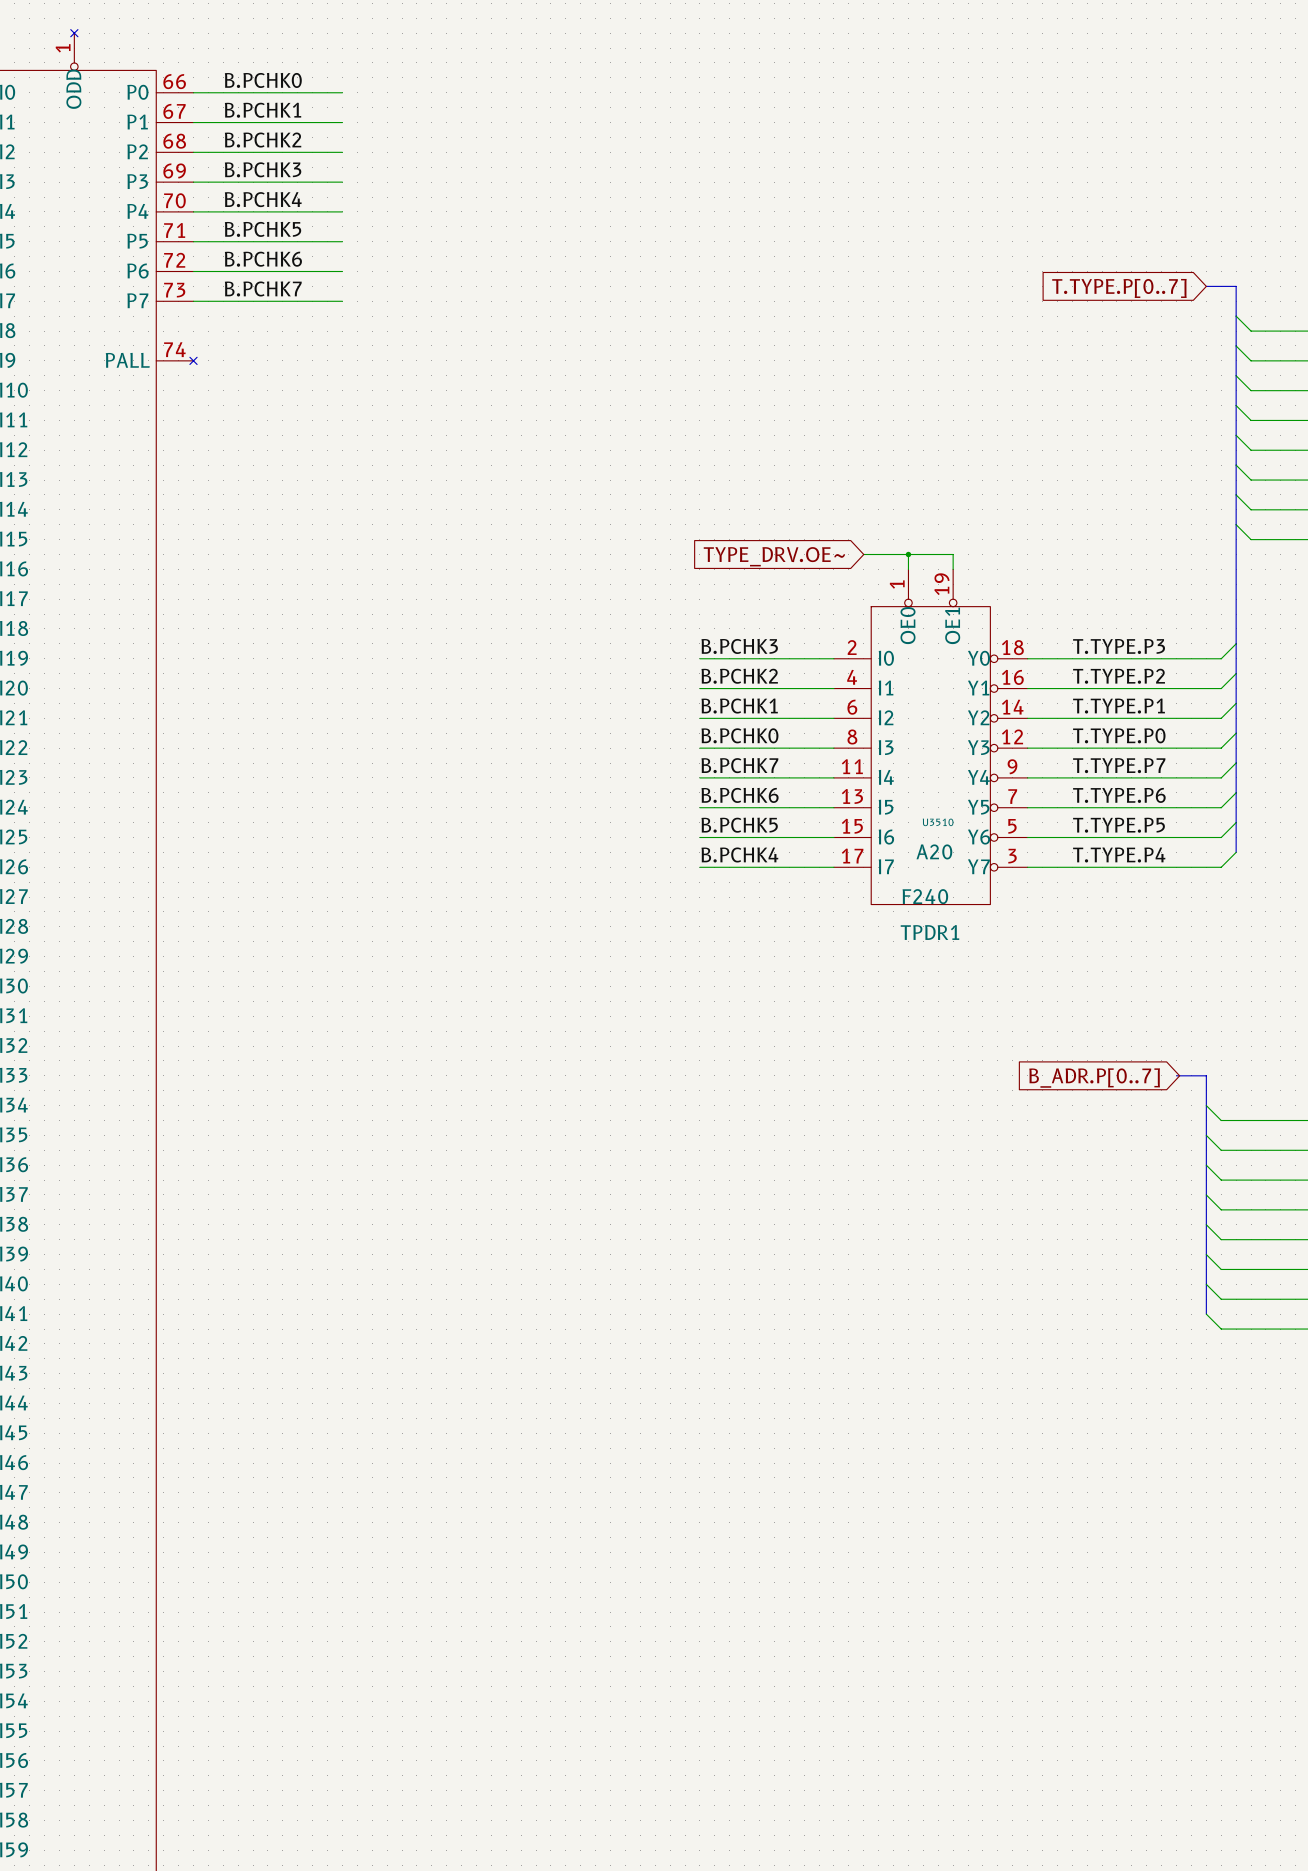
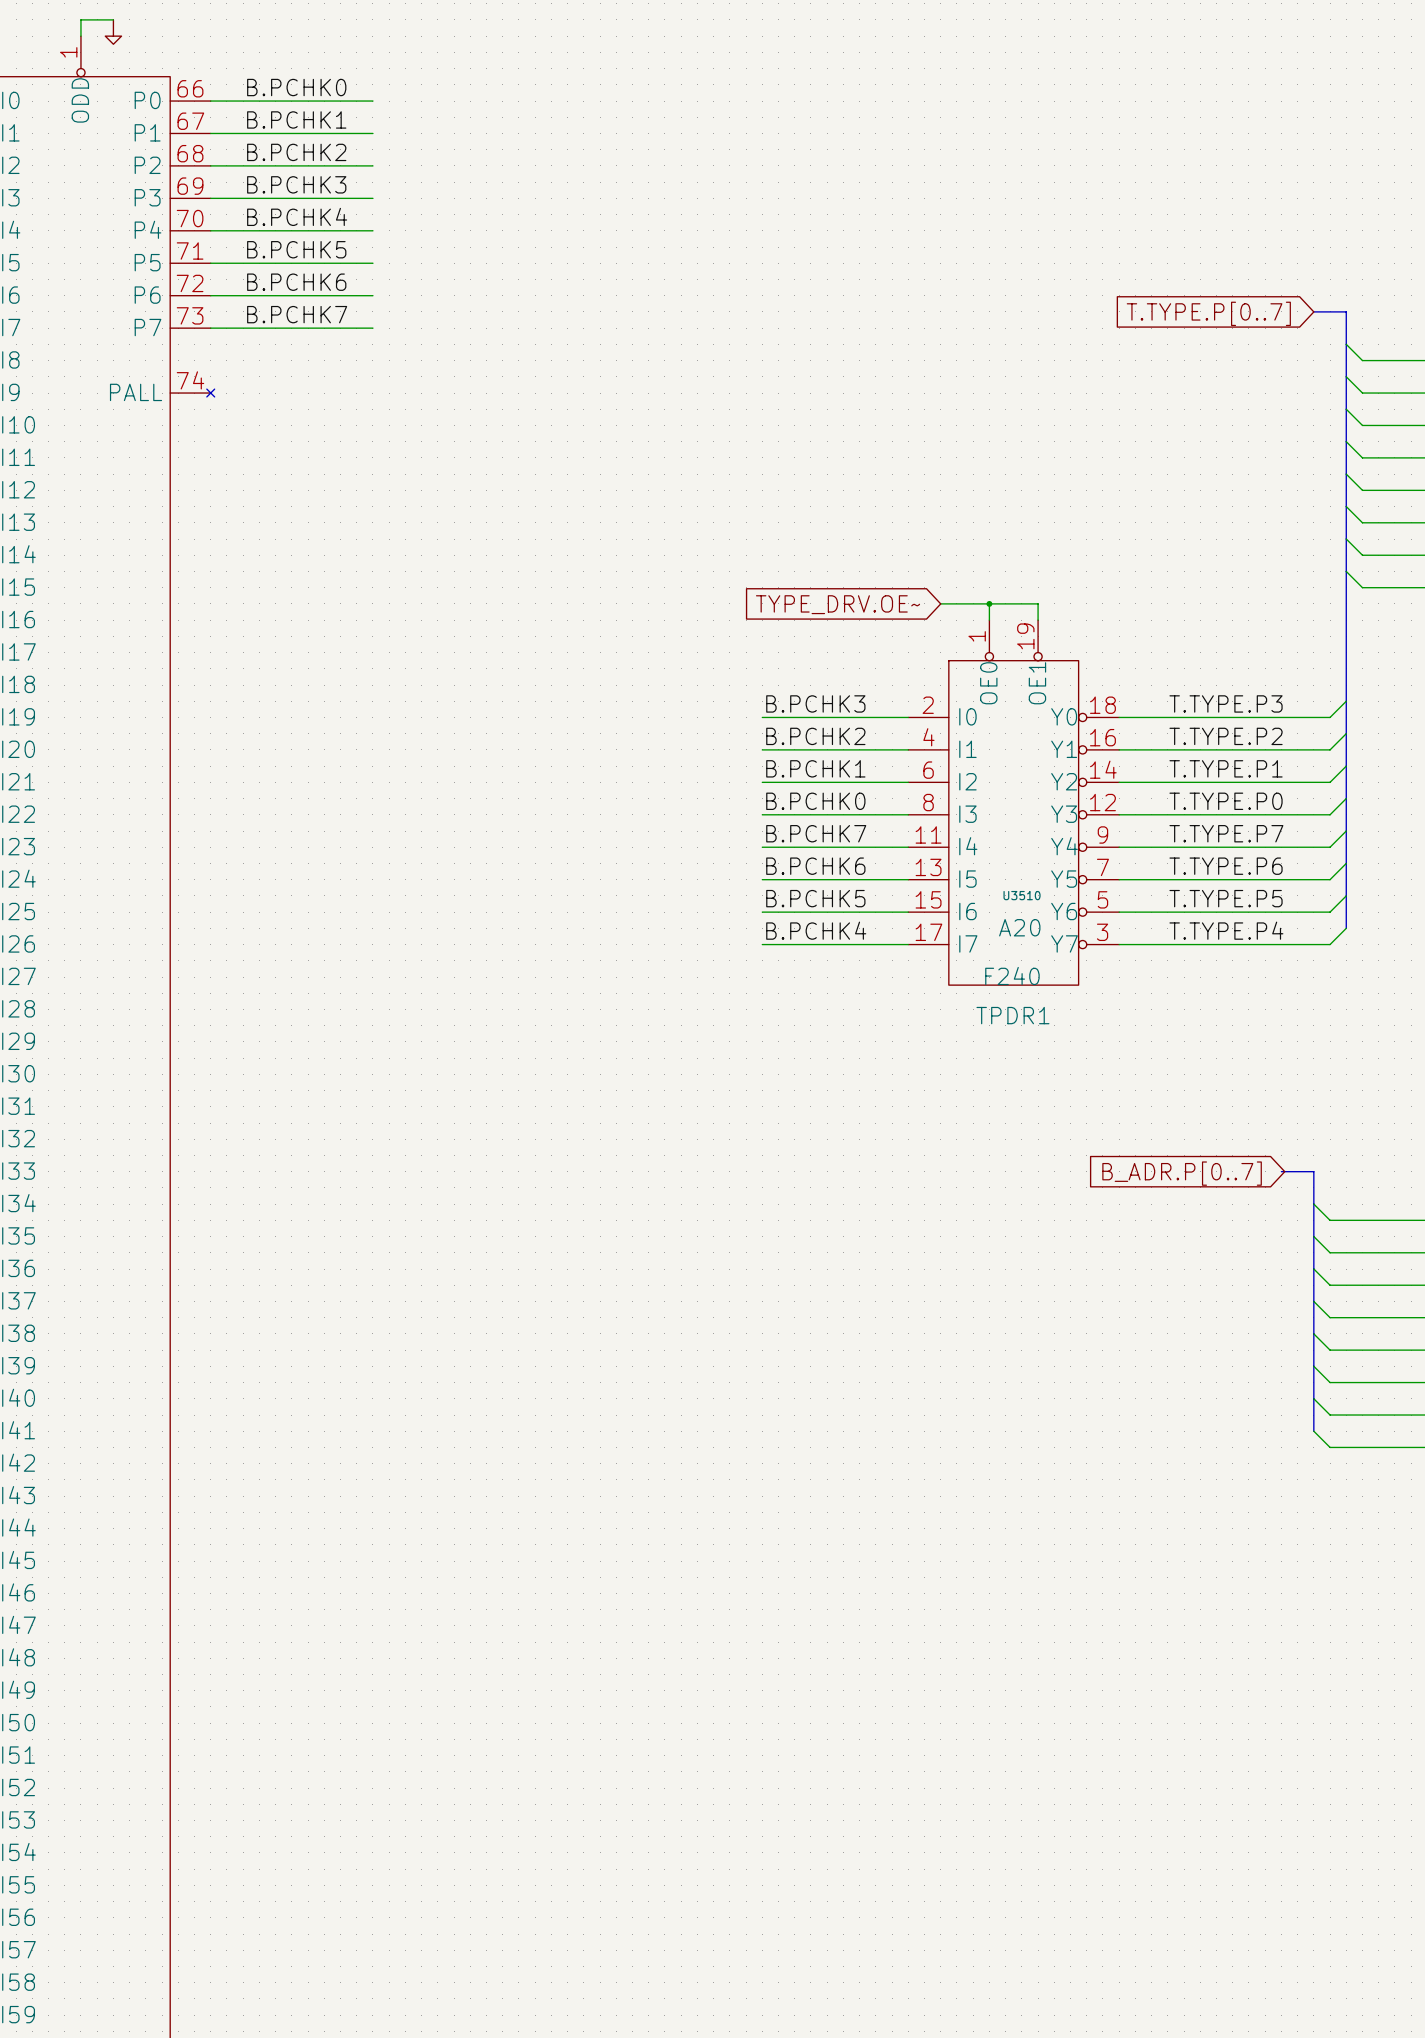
wire: none -> (113, 19) (80, 19) (80, 36)
power symbol: none -> (113, 32)
no-connect mark: (74, 33) -> none

